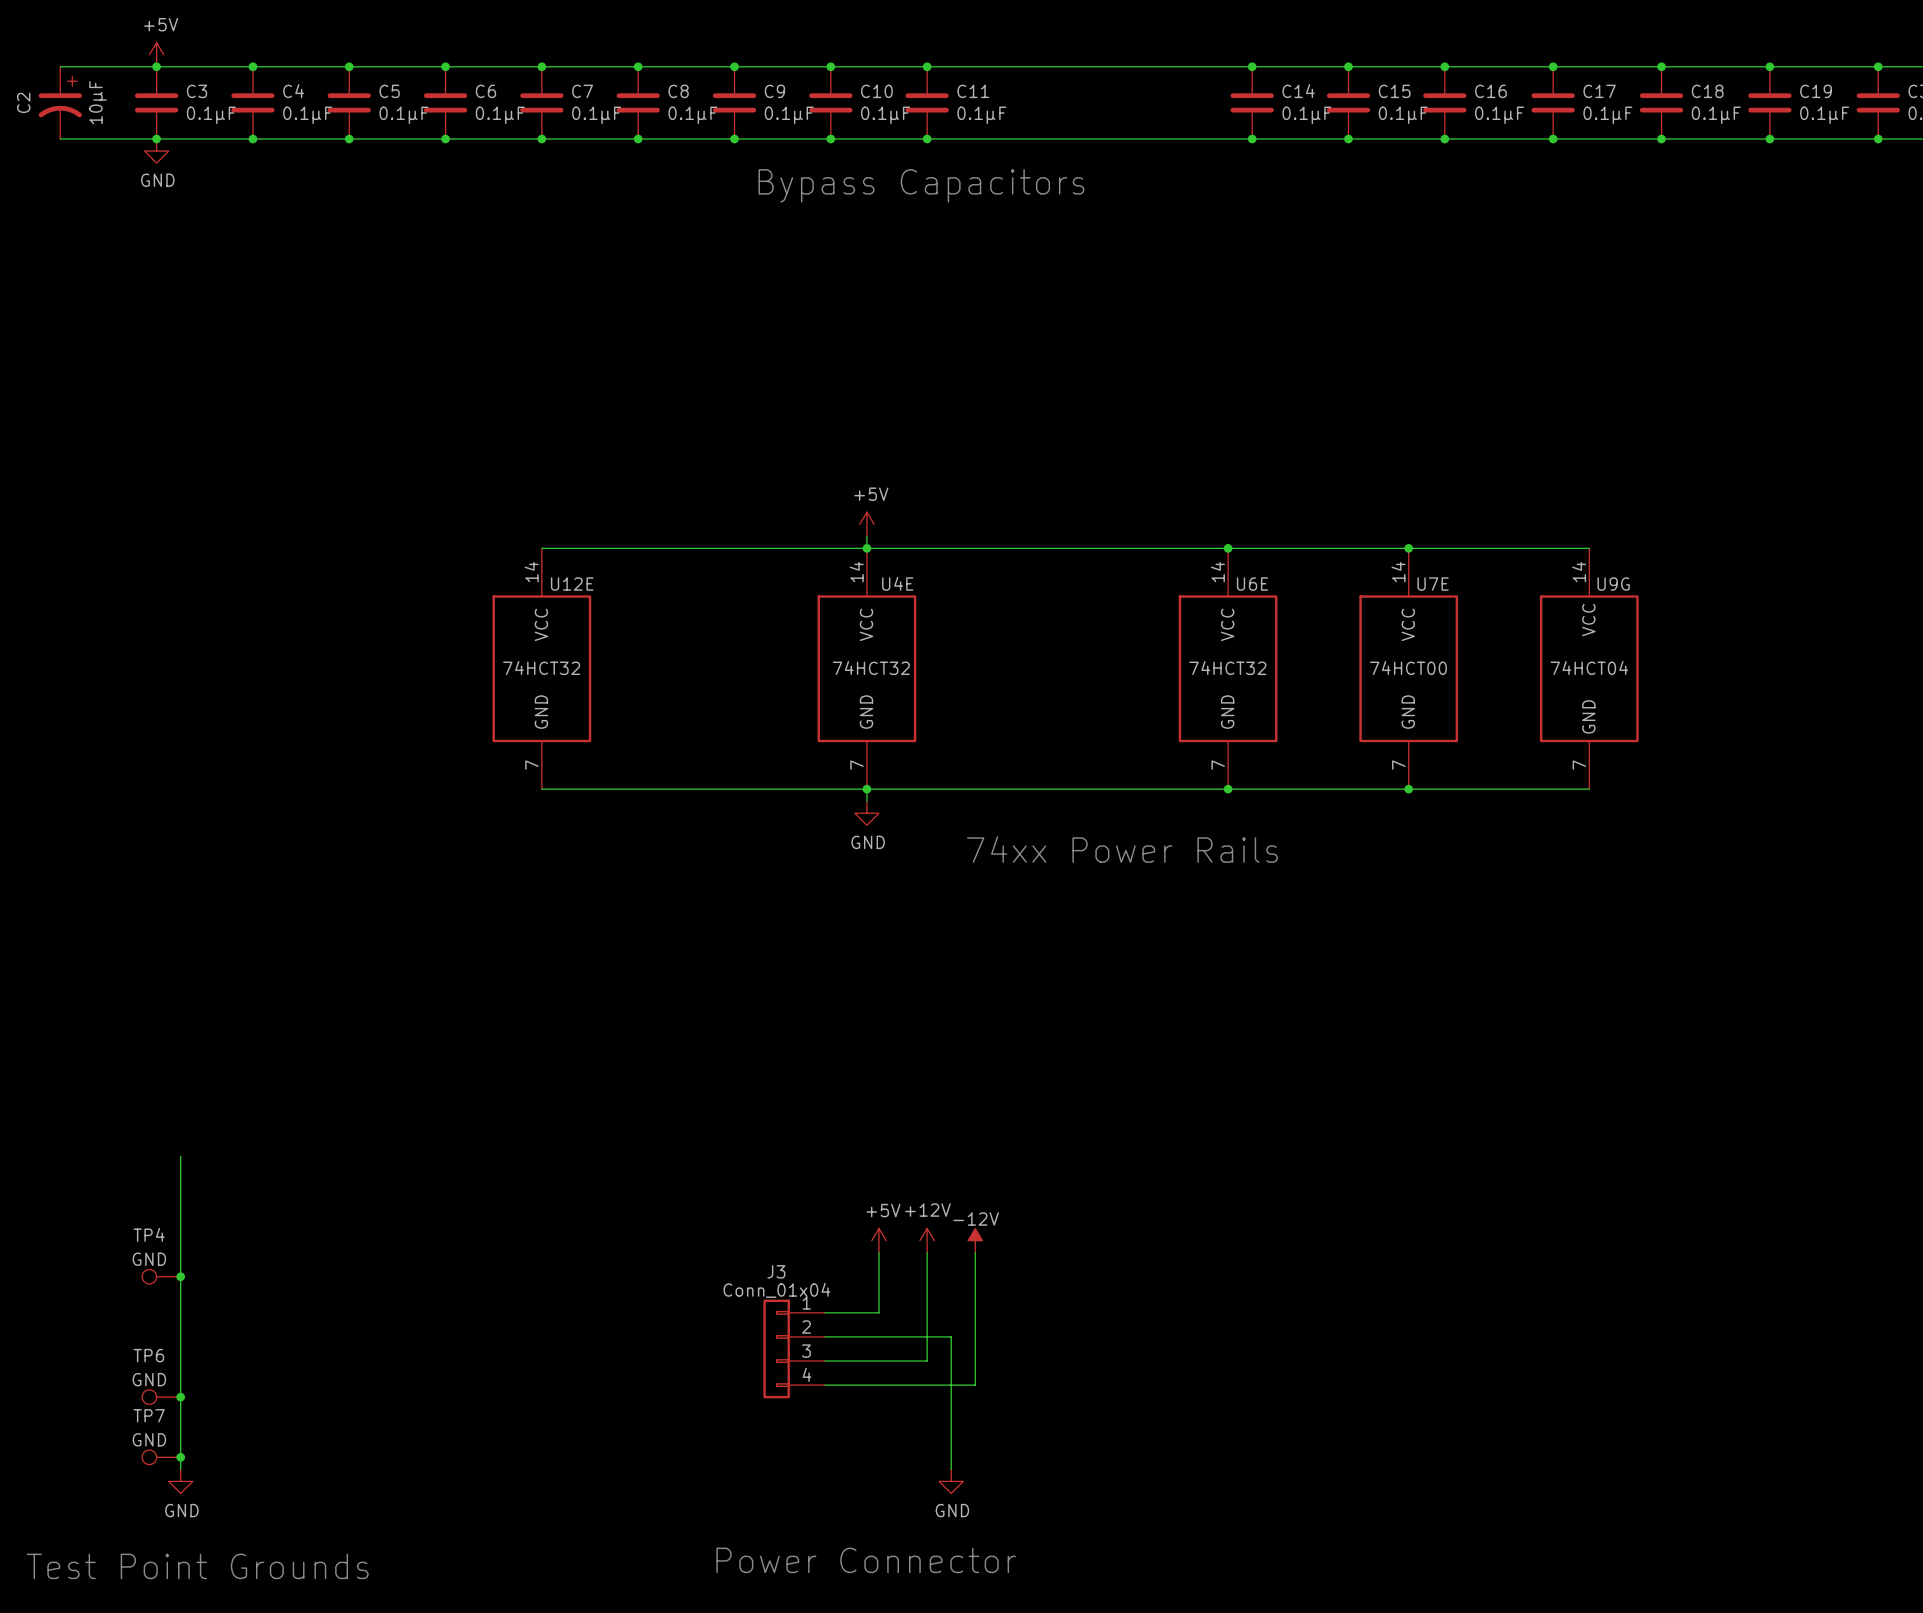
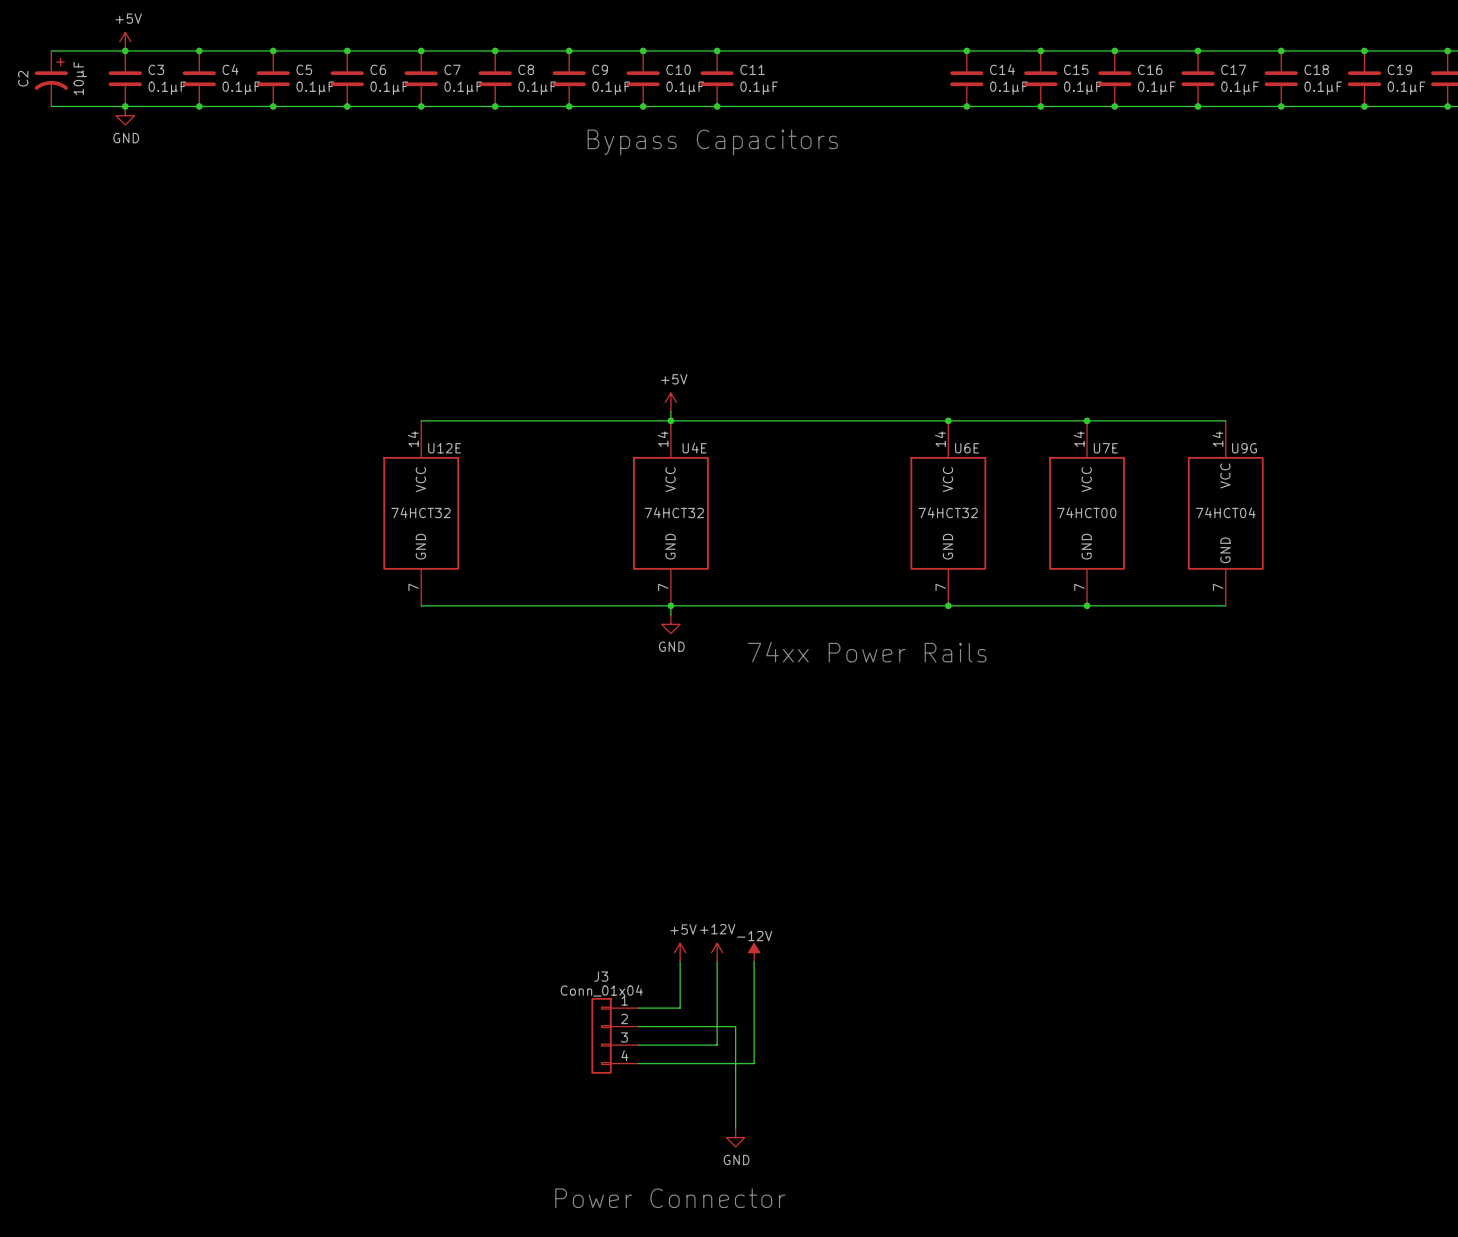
wire: (180, 1156) (180, 1469) -> none
TP4: GND (161, 1276) -> none
junction: (180, 1276) -> none
TP6: GND (161, 1397) -> none
junction: (180, 1397) -> none
TP7: GND (161, 1457) -> none
junction: (180, 1457) -> none
power symbol: GND (180, 1481) -> none
text: Test Point Grounds (197, 1566) -> none

